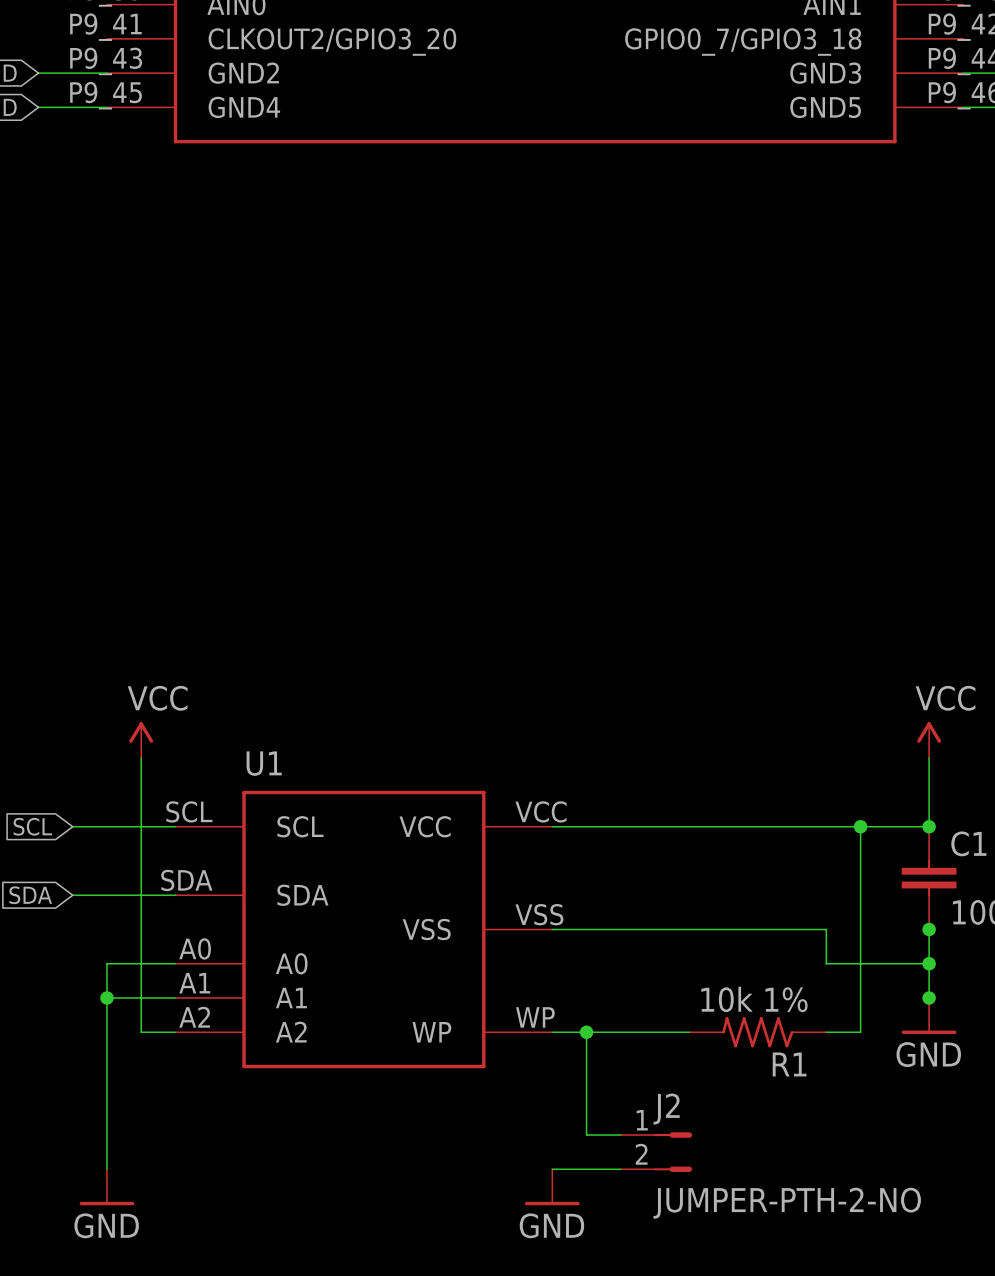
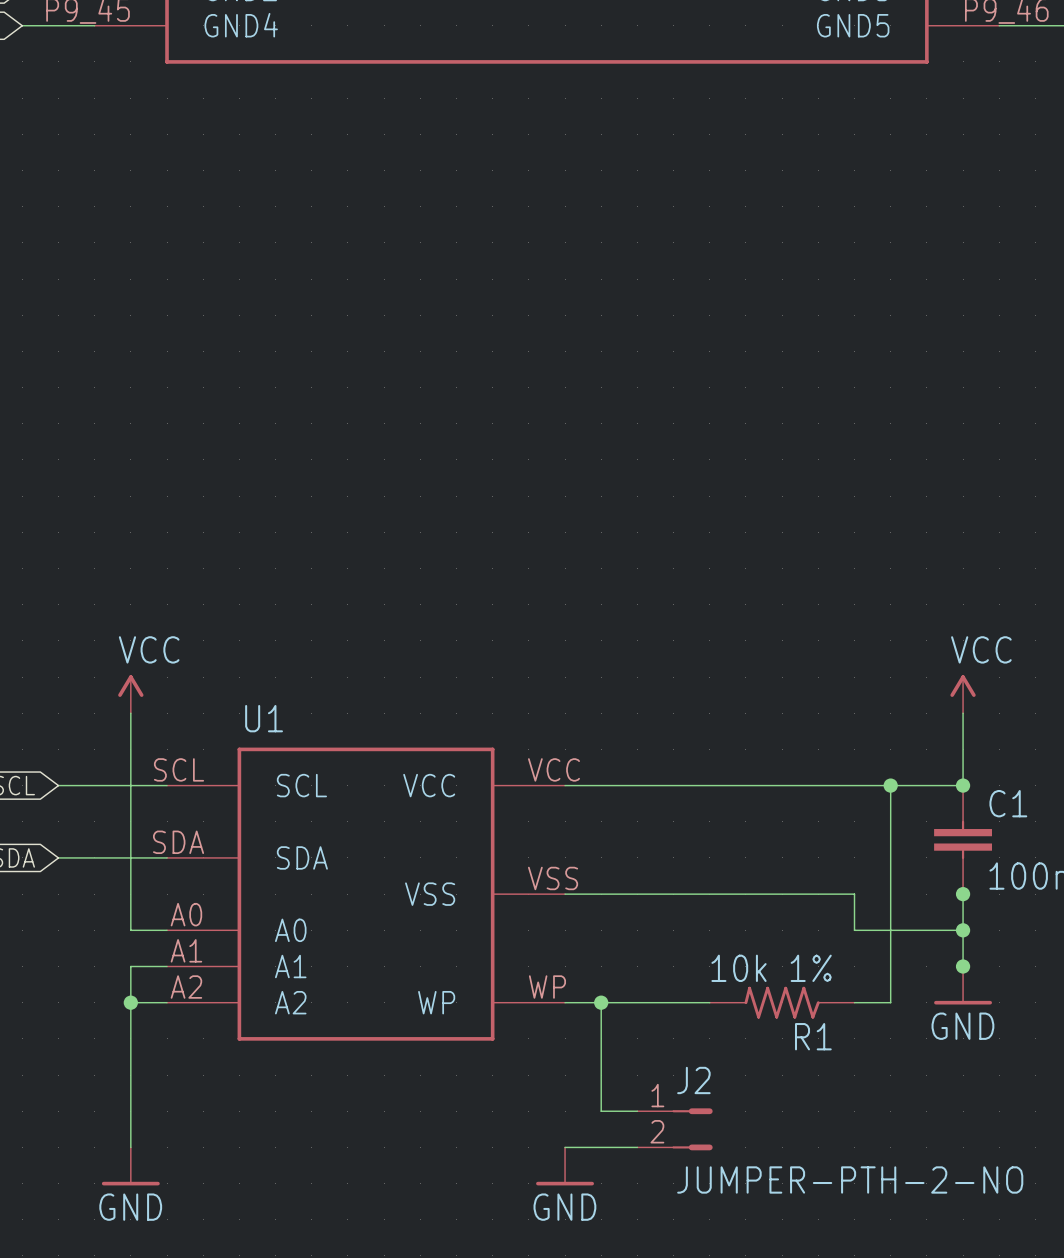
wire: (106, 998) (141, 998) (141, 963) (106, 963) (106, 1169) -> none
junction position: (106, 998) -> (130, 1002)
wire: none -> (130, 1002) (130, 1147)
power symbol position: GND (106, 1187) -> GND (130, 1166)

